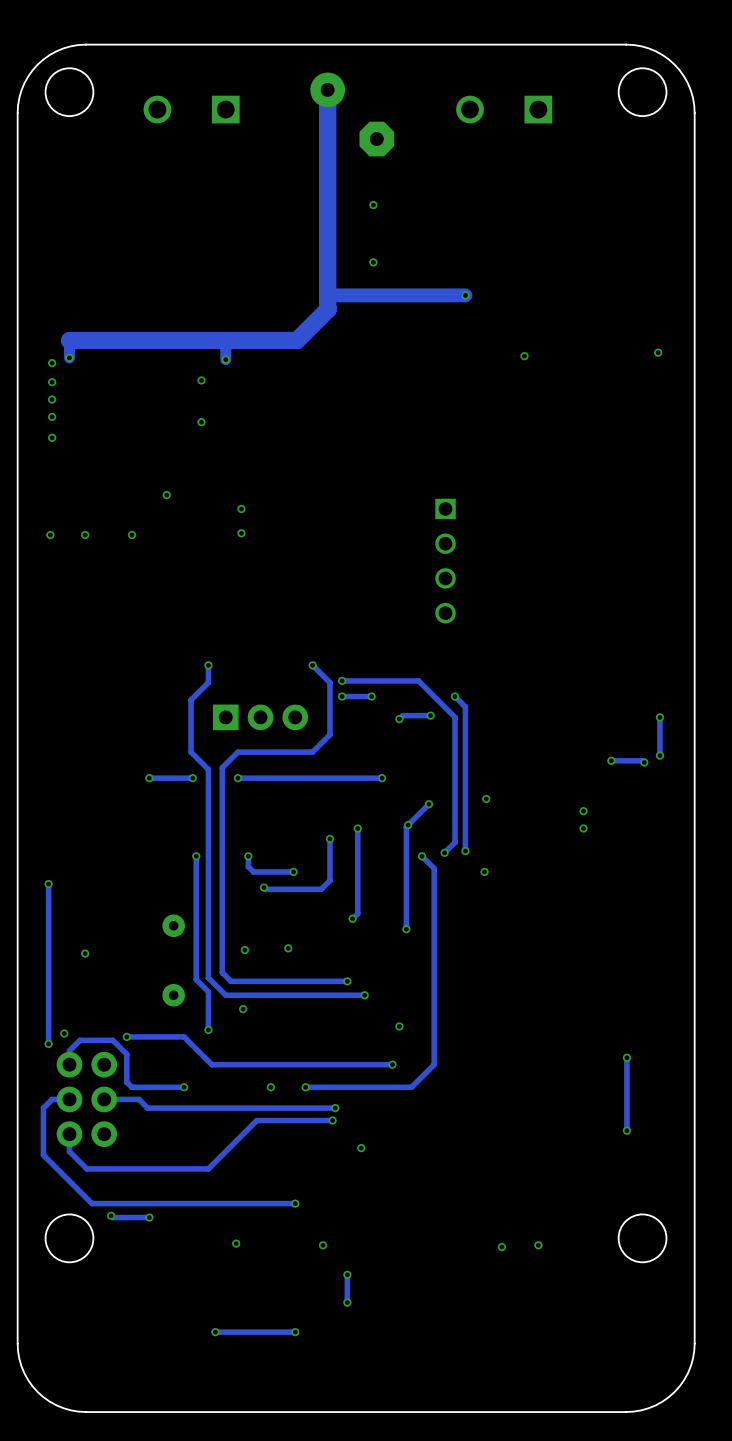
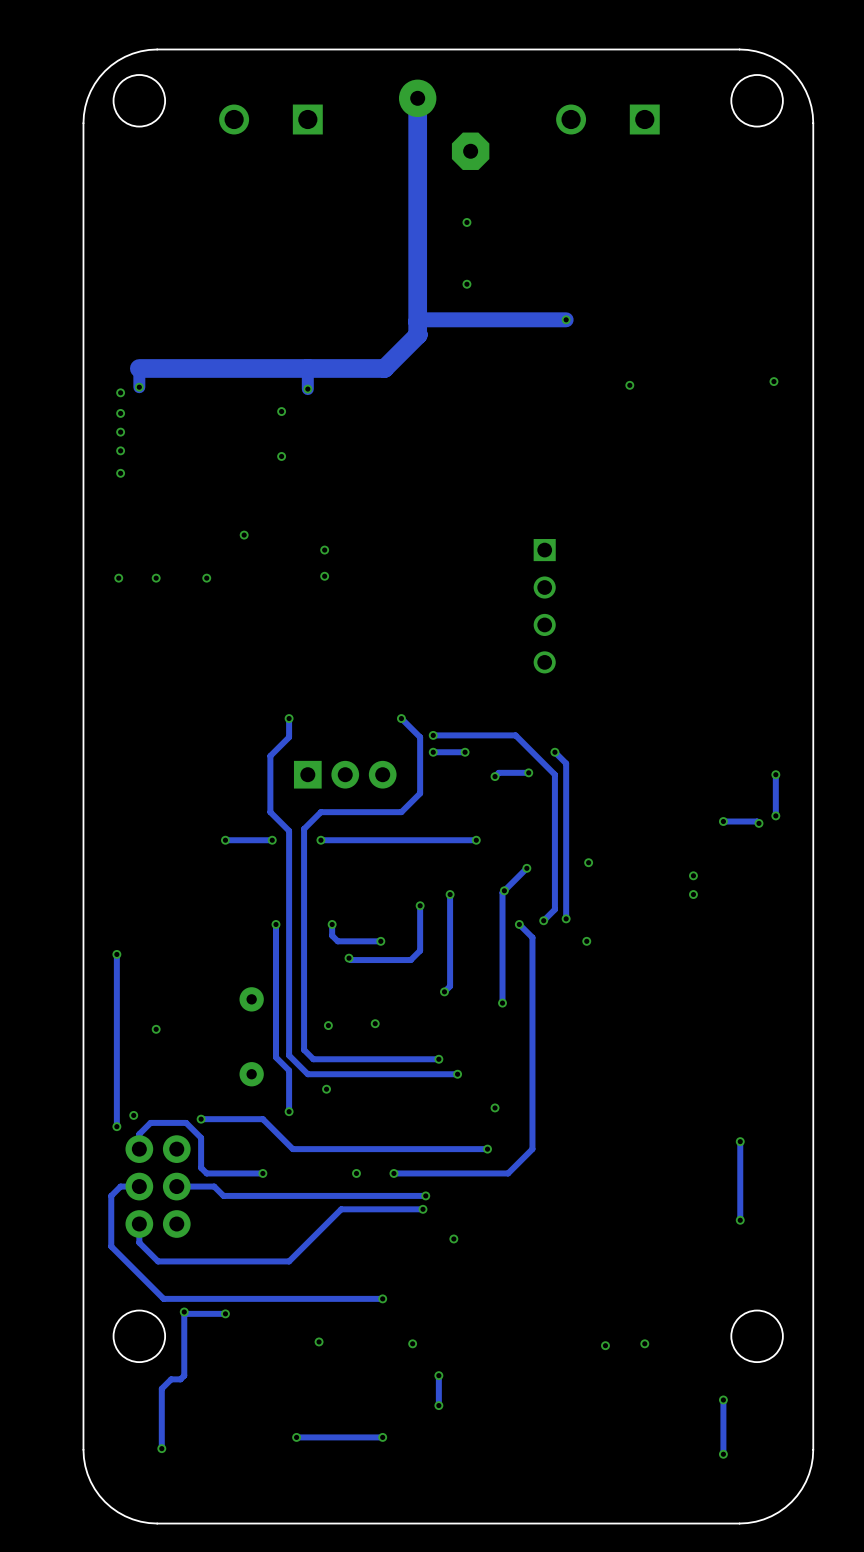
track: none -> (184, 1311) (184, 1375) (180, 1379) (171, 1379) (161, 1388) (161, 1448)
track: none -> (723, 1399) (723, 1454)
via: none -> (723, 1399)
via: none -> (161, 1448)
via: none -> (723, 1454)

